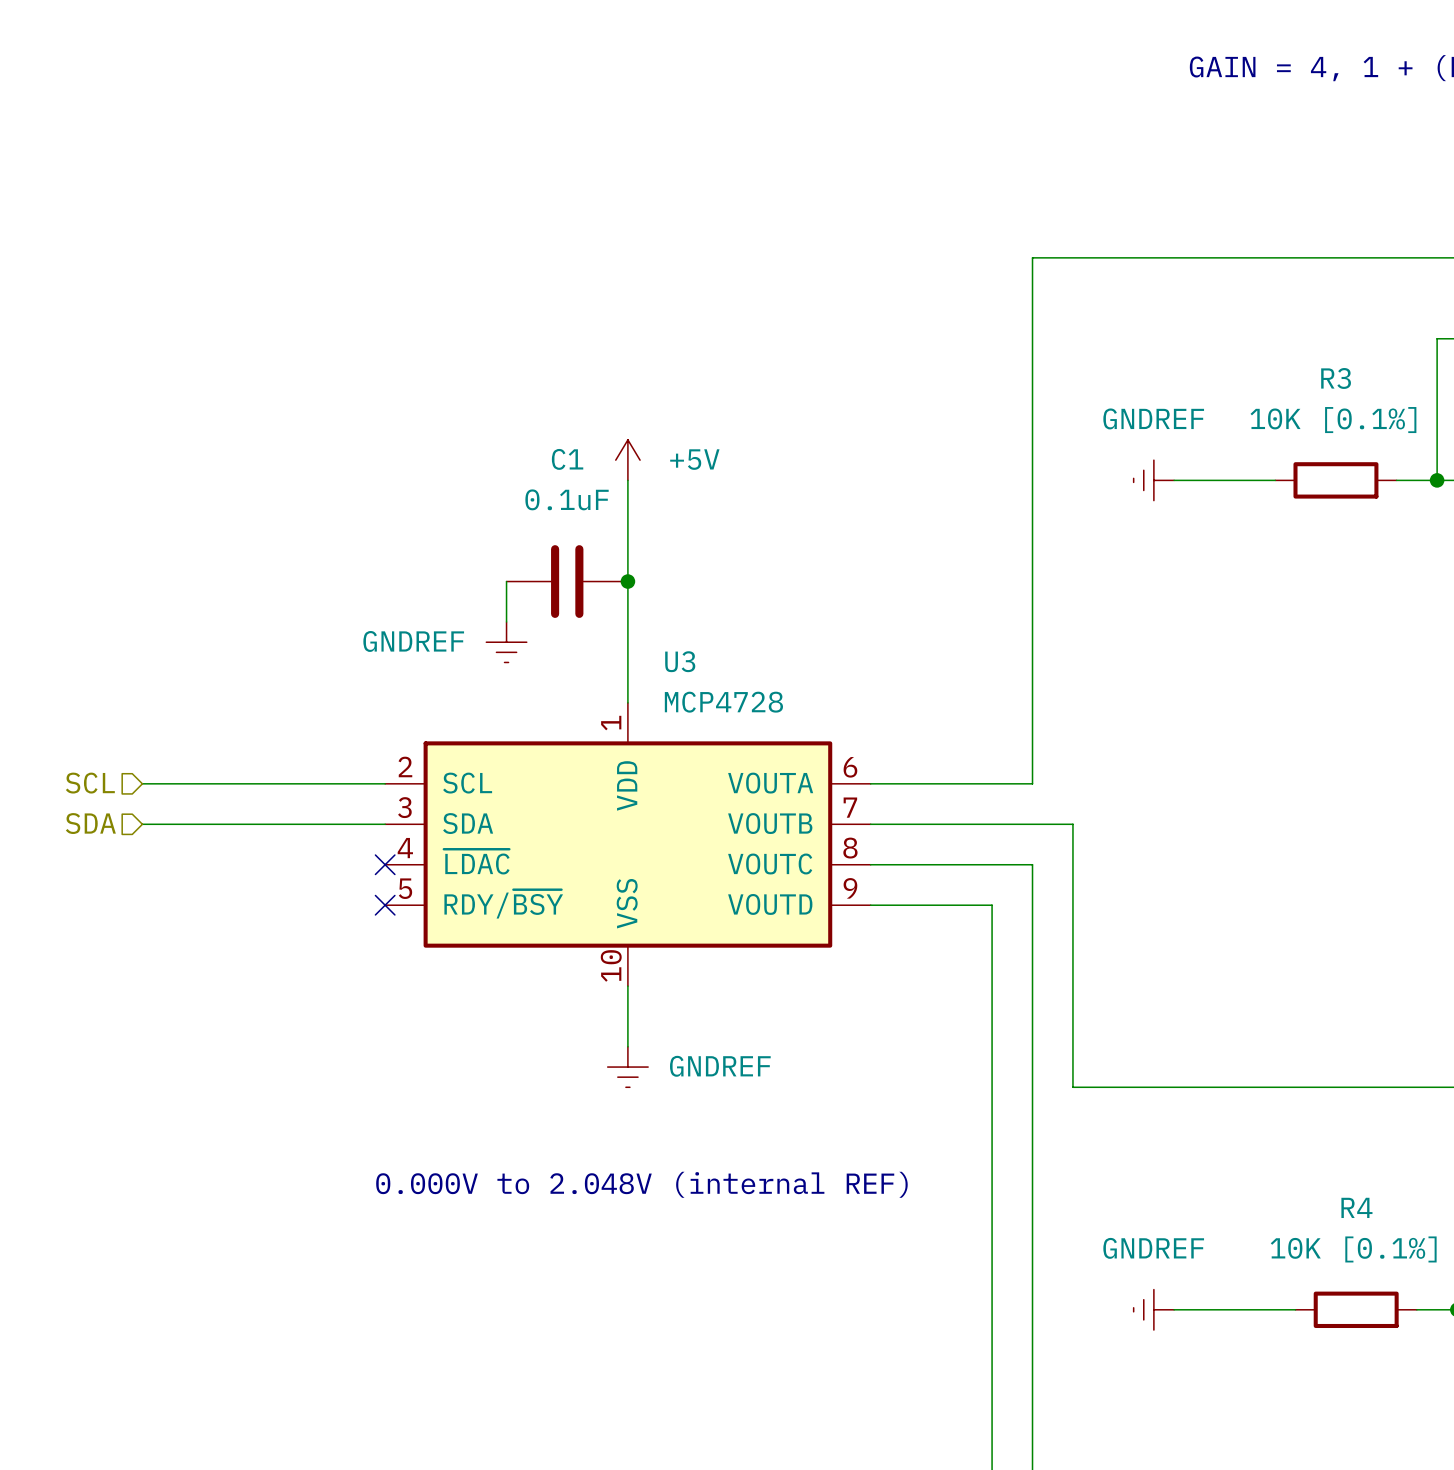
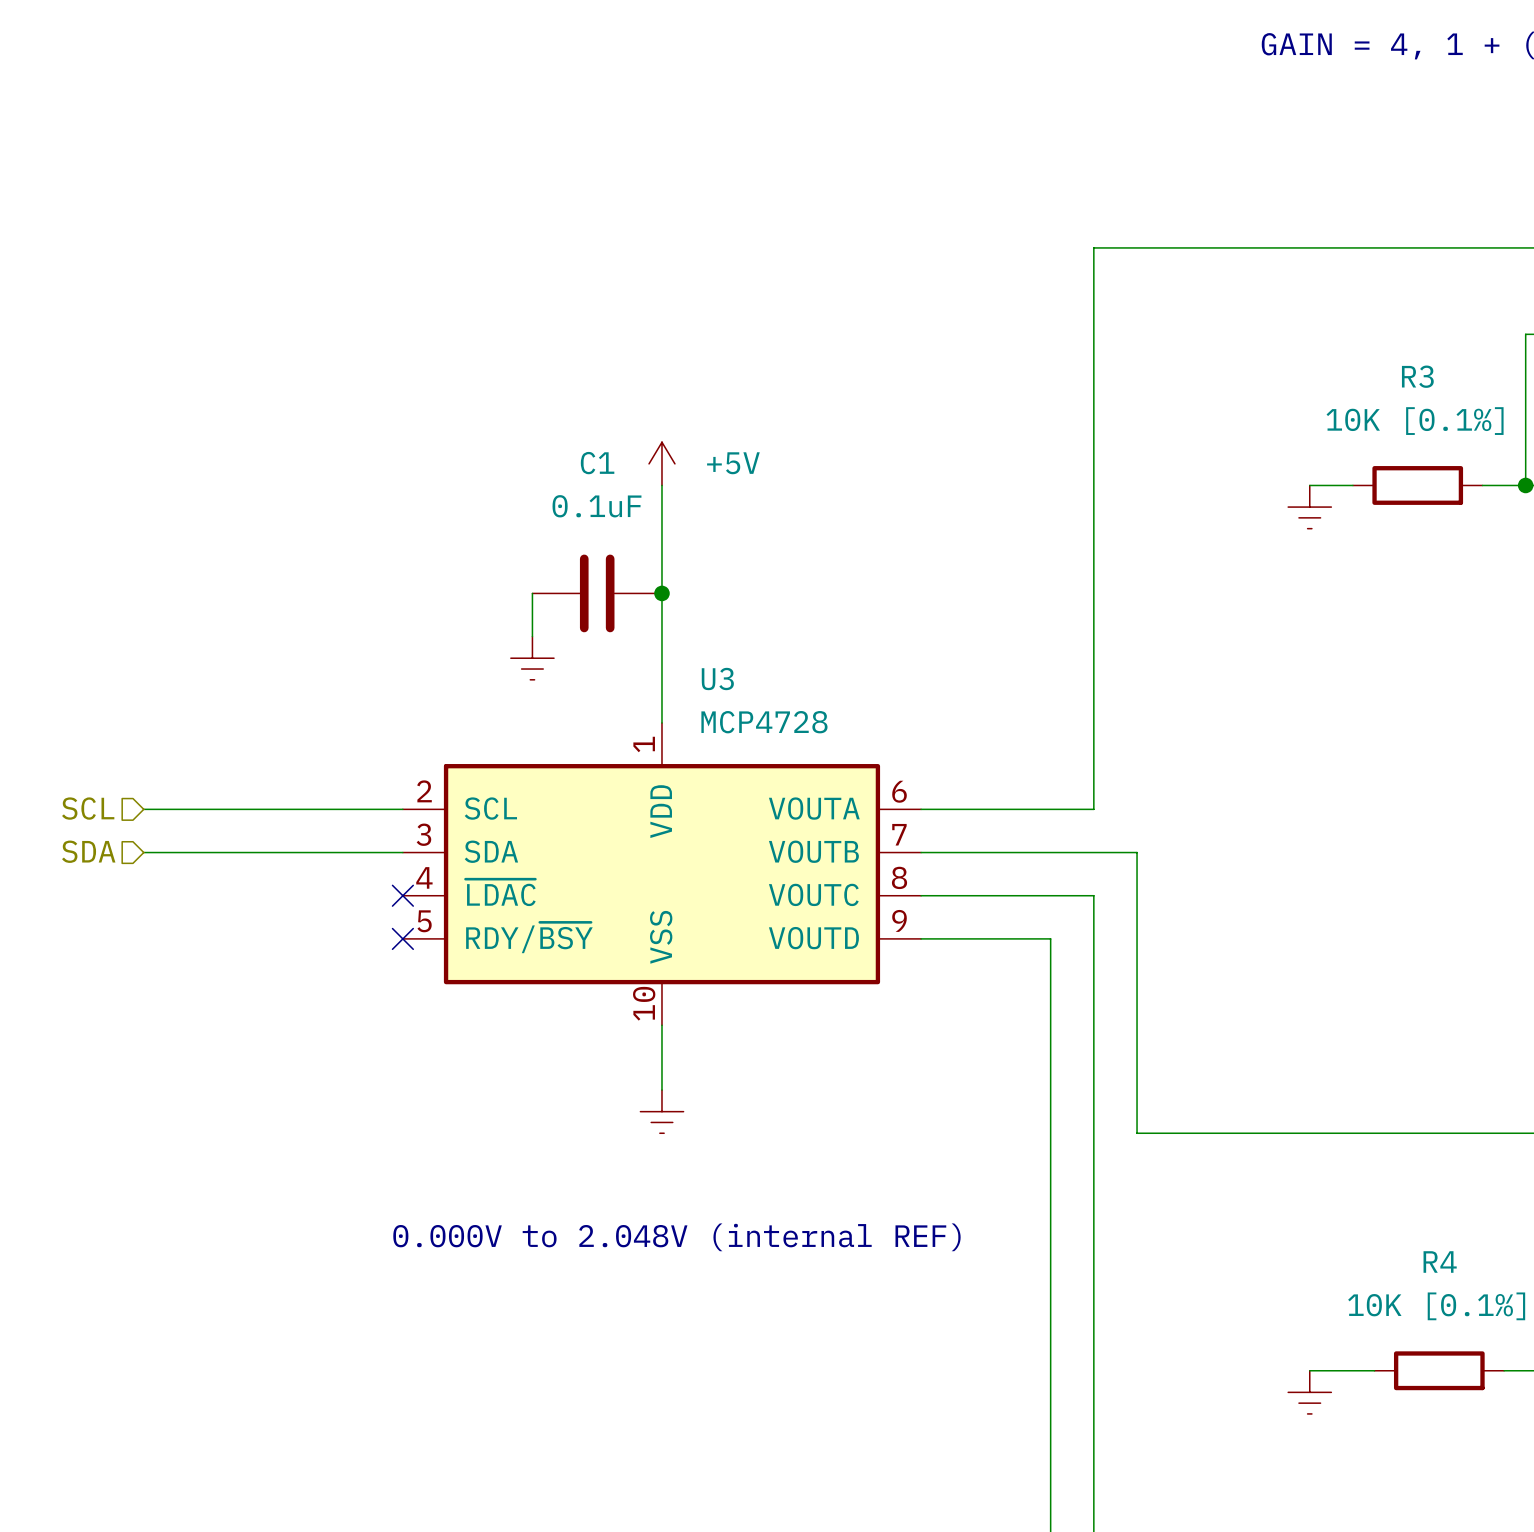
power symbol: GNDREF (1153, 480) -> none
wire: (1174, 480) (1234, 480) -> none
power symbol: none -> (1309, 507)
power symbol text: GNDREF (413, 641) -> none
power symbol text: GNDREF (720, 1066) -> none
power symbol: GNDREF (1153, 1309) -> none
wire: (1174, 1309) (1234, 1309) -> none
power symbol: none -> (1309, 1392)

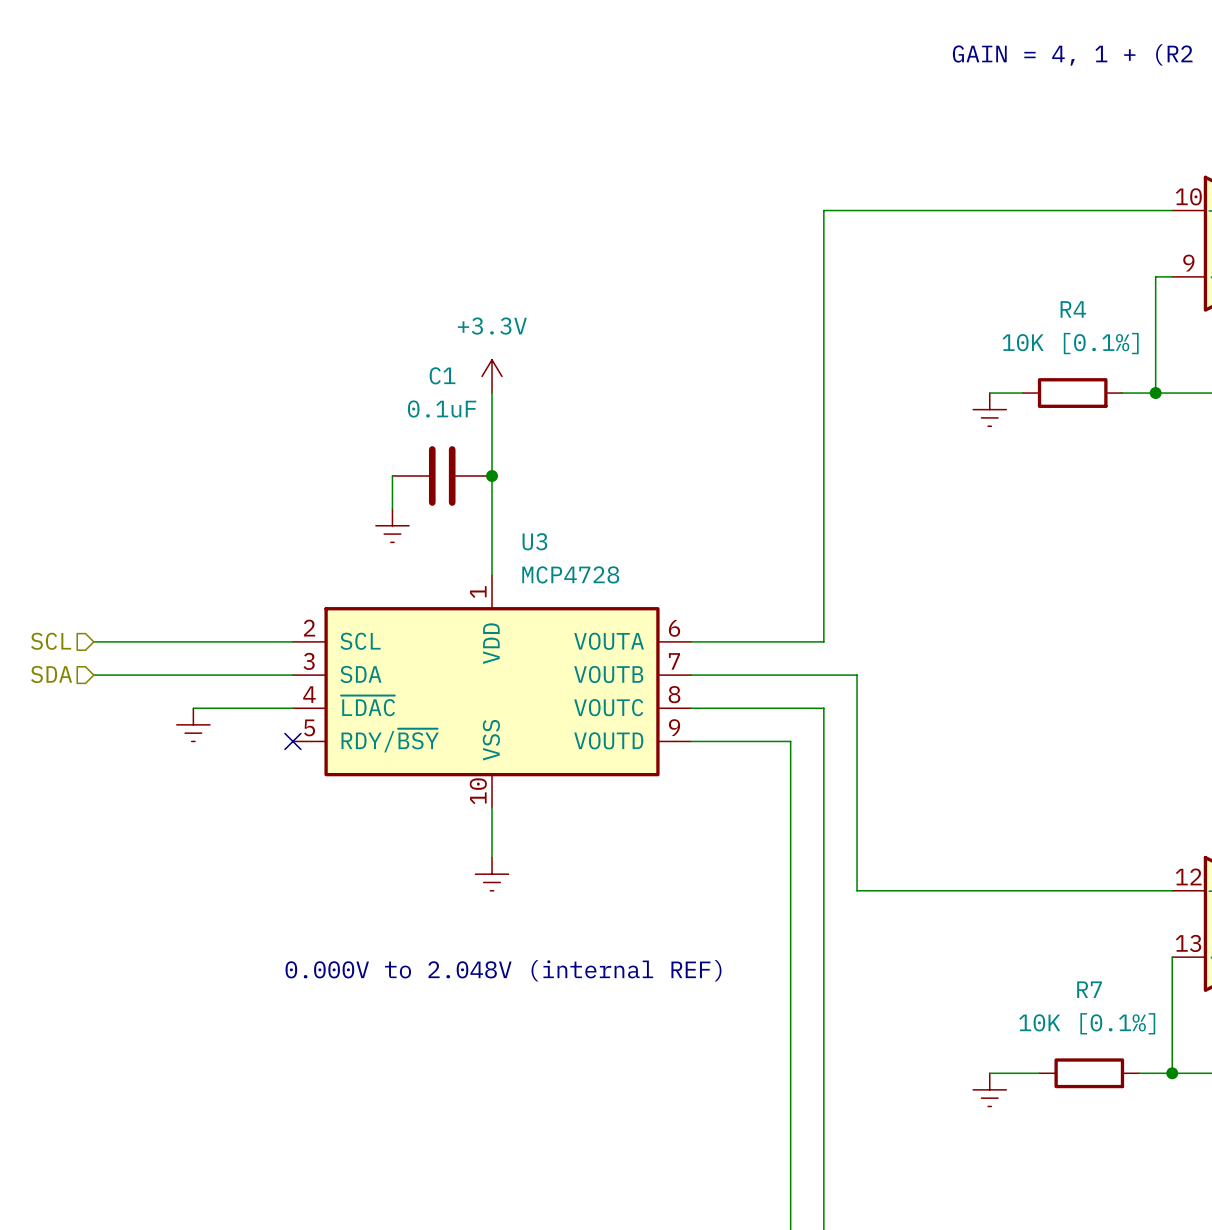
R3 name: R3 (1417, 376) -> R4 (1073, 309)
power symbol: +5V (661, 463) -> +3.3V (492, 376)
wire: none -> (193, 708) (292, 708)
no-connect mark: (402, 895) -> none
power symbol: none -> (193, 724)
R4 name: R4 (1440, 1261) -> R7 (1089, 989)

